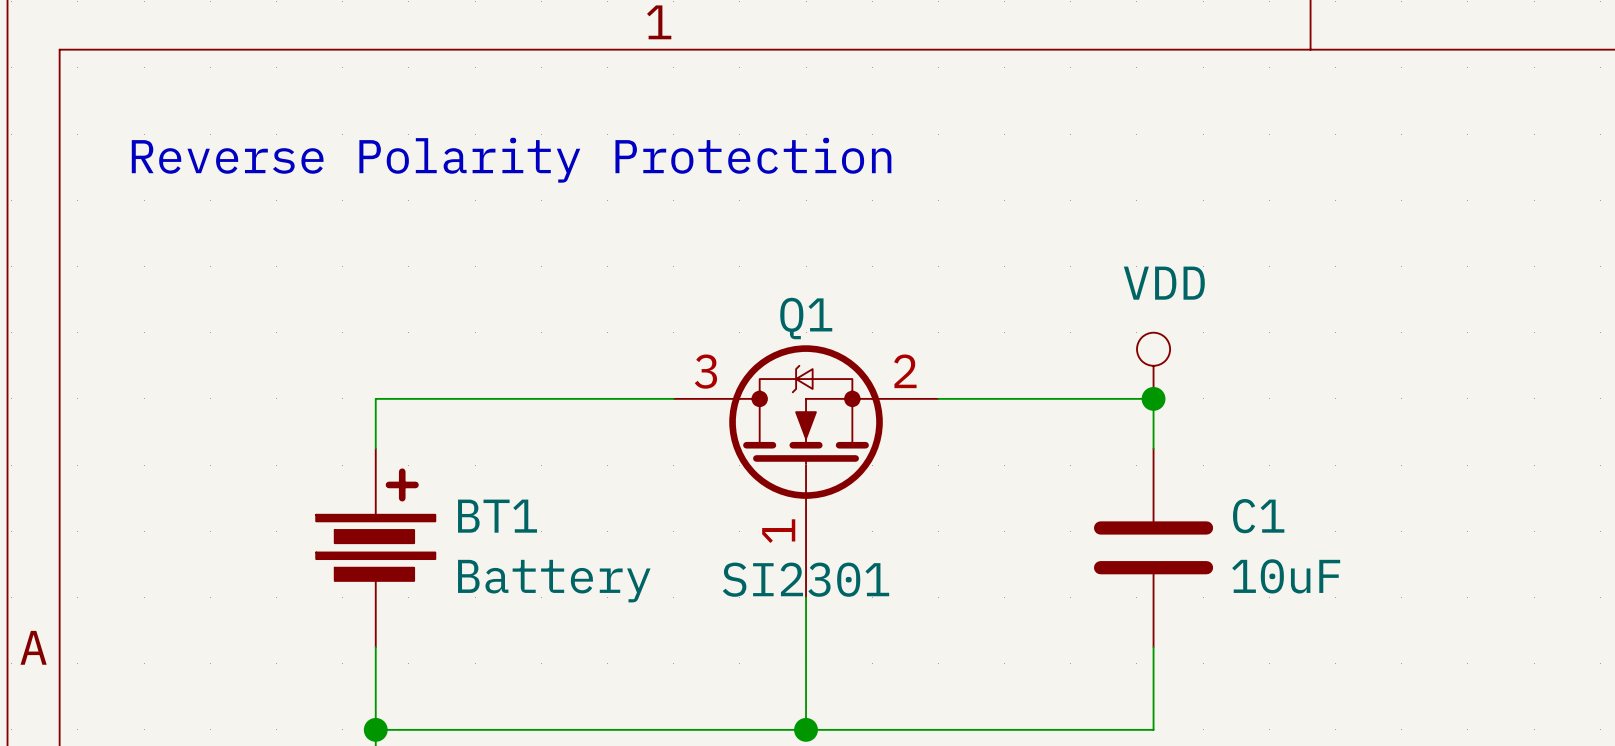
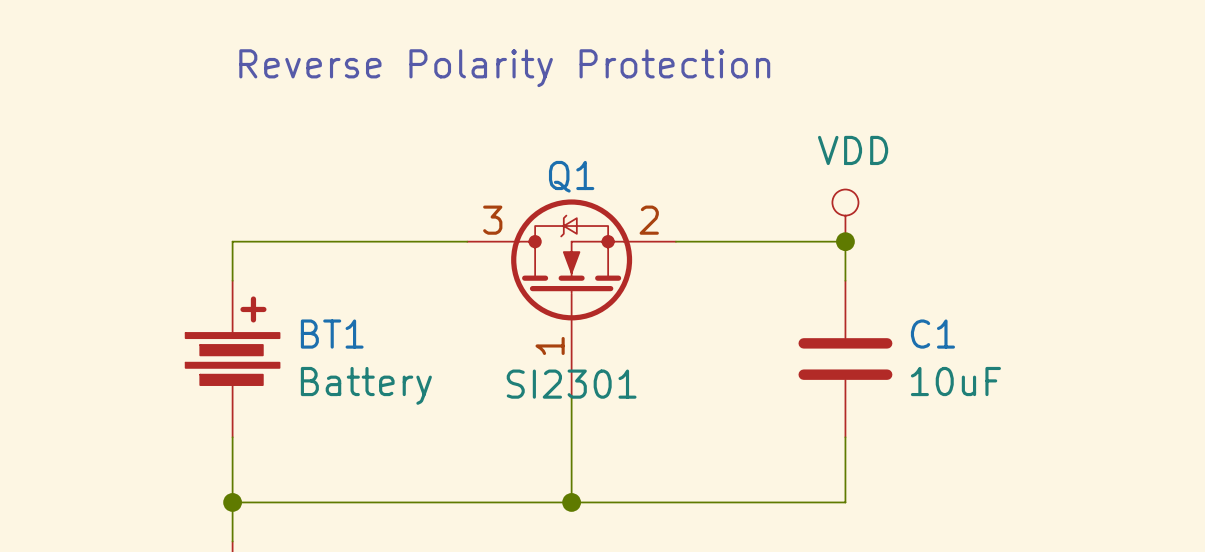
text position: Reverse Polarity Protection (511, 160) -> Reverse Polarity Protection (504, 68)

